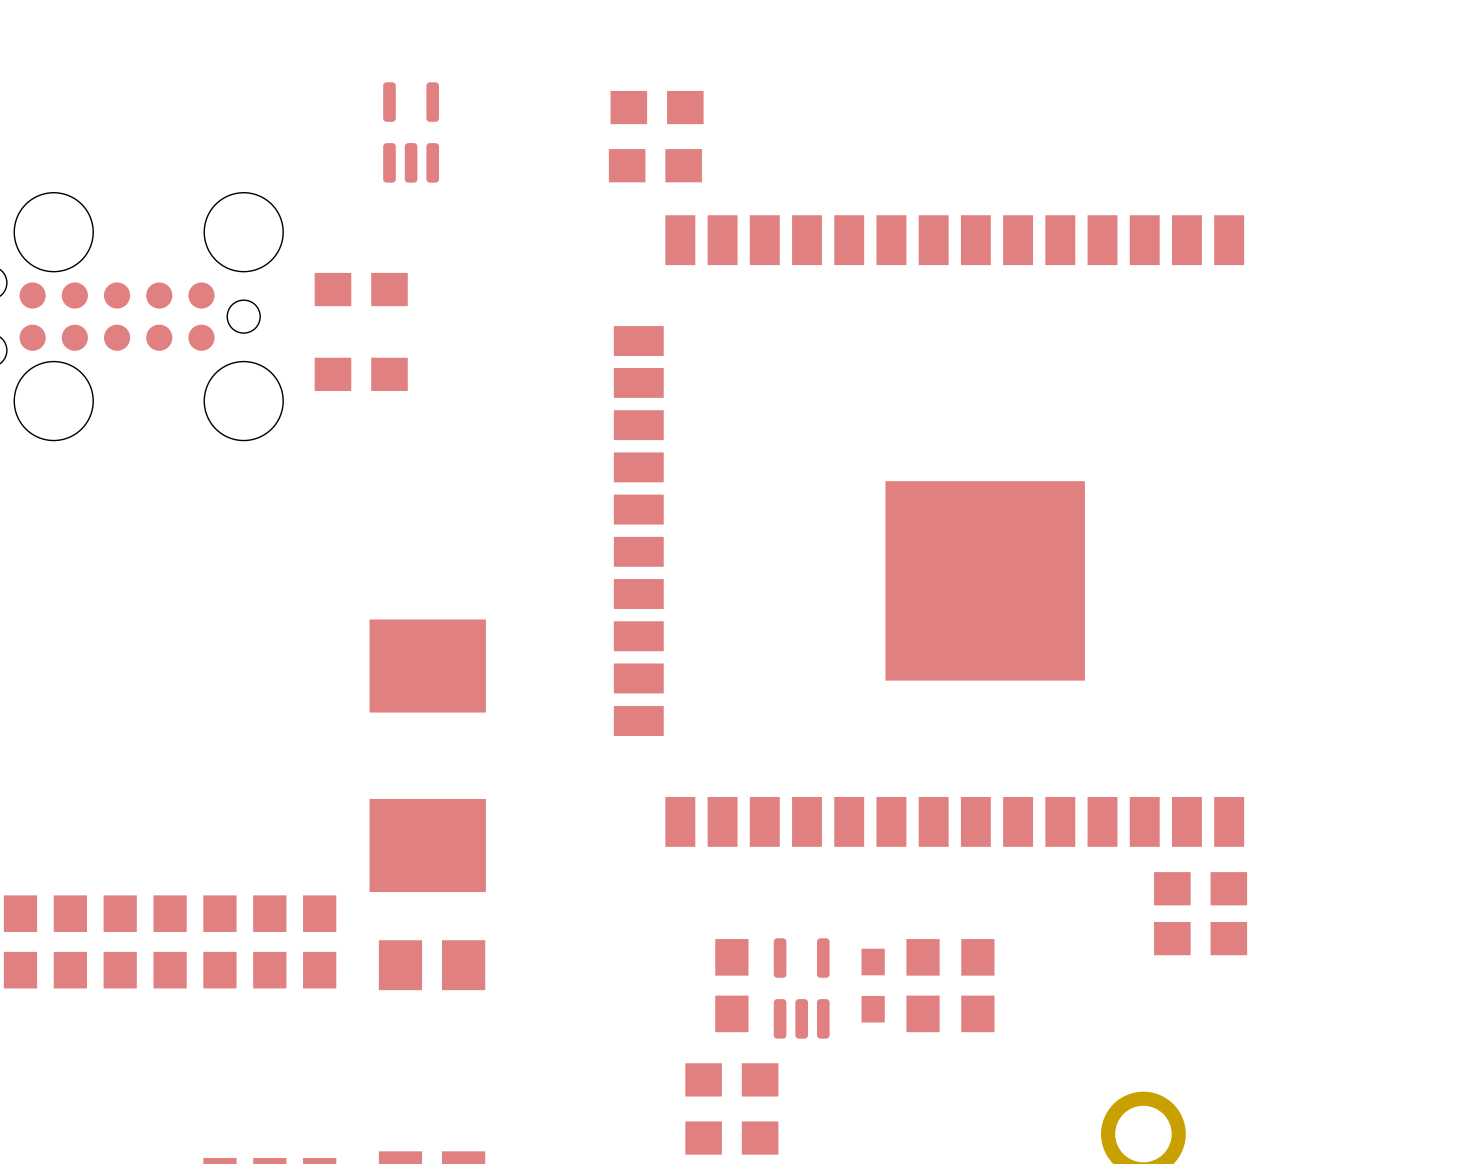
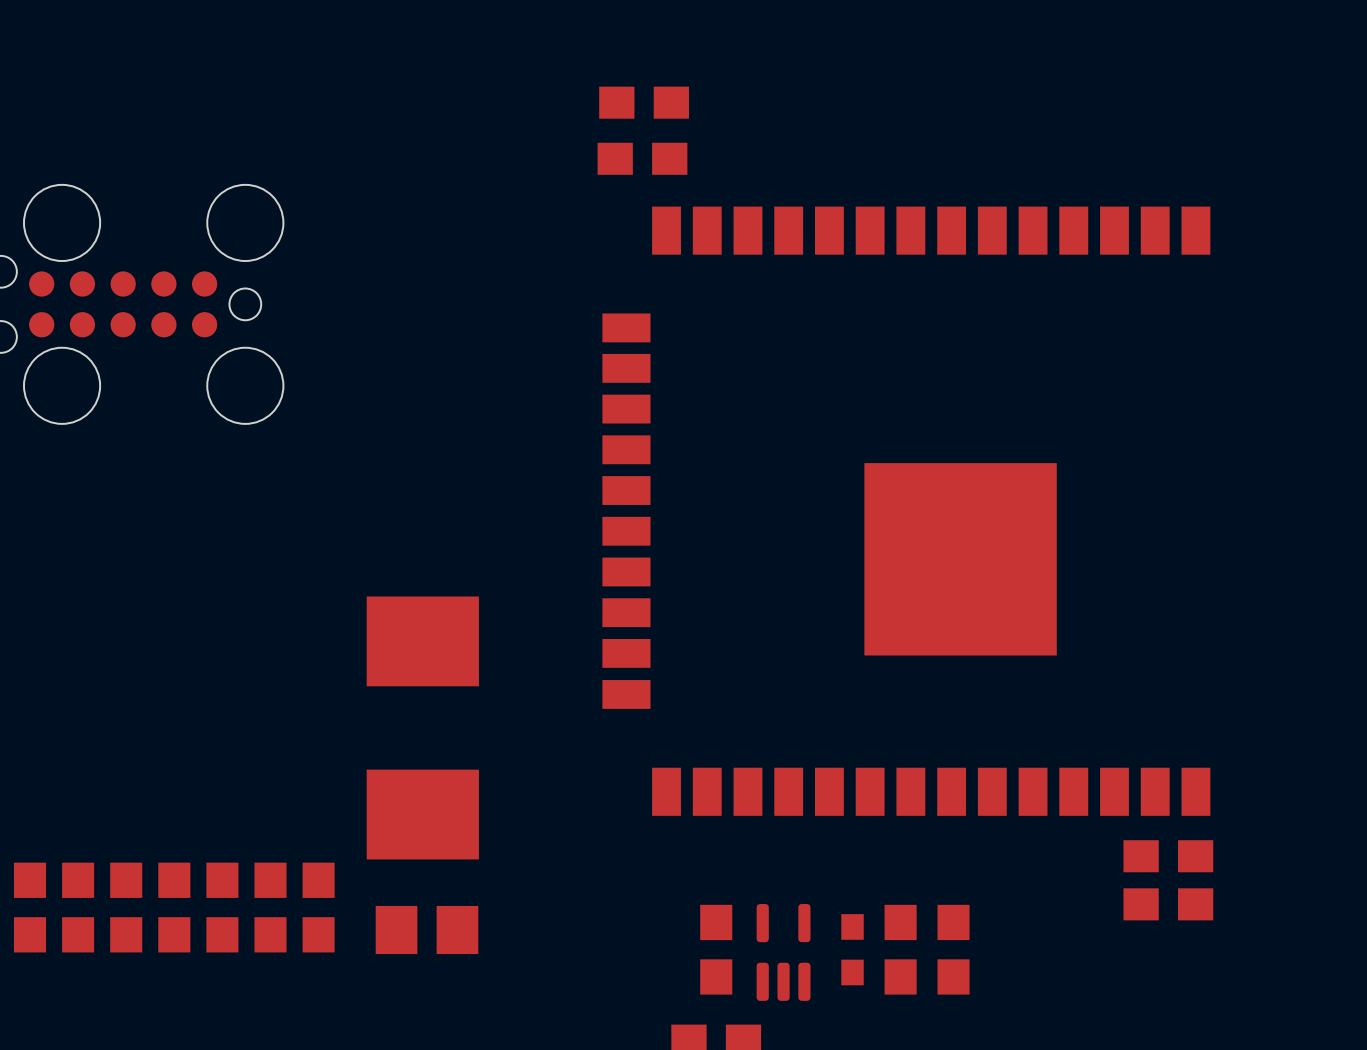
part: (411, 132) -> none
part: (361, 289) -> none
part: (361, 374) -> none

